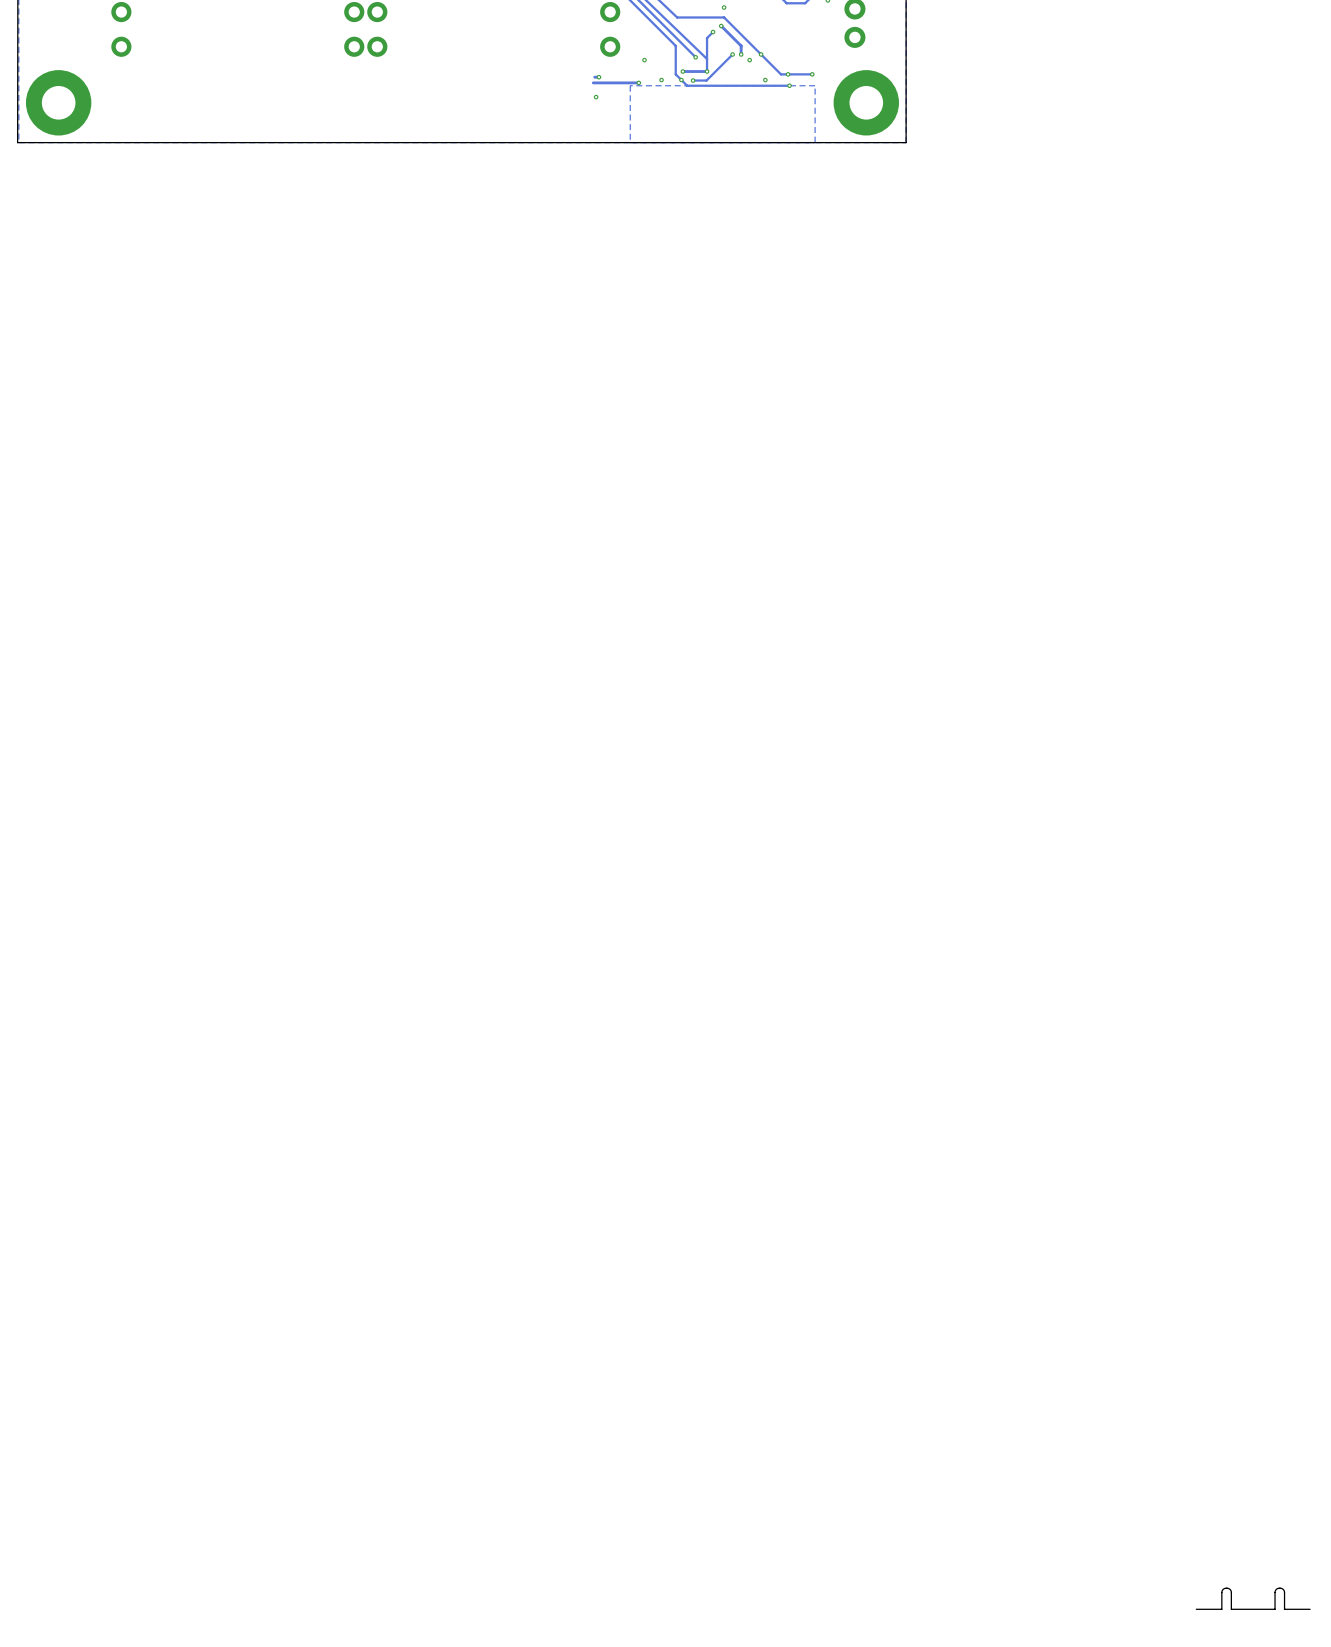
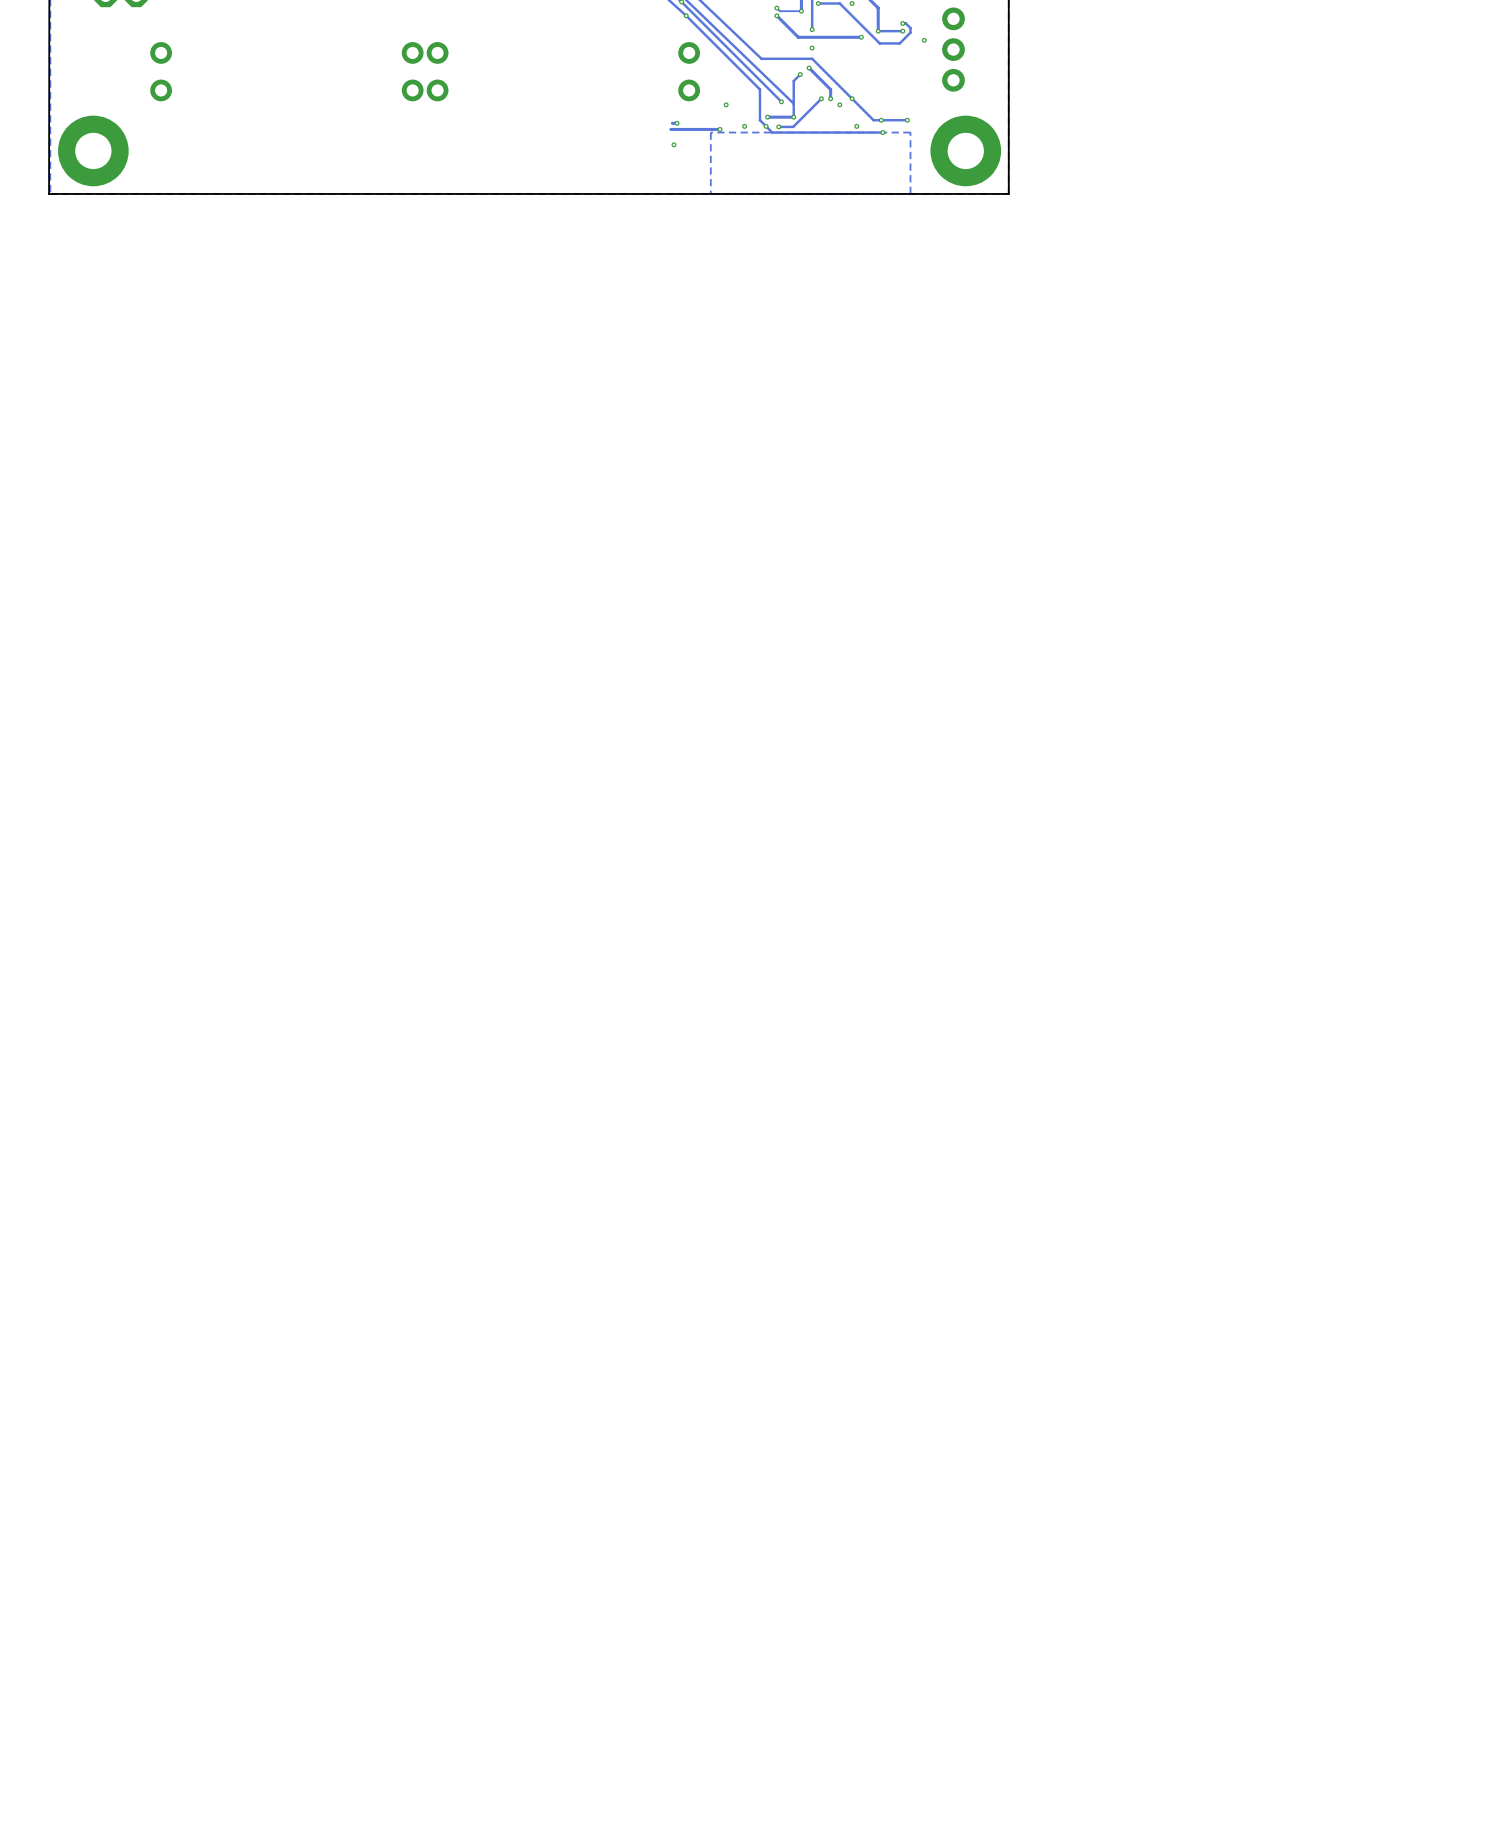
part: (1253, 1598) -> none

